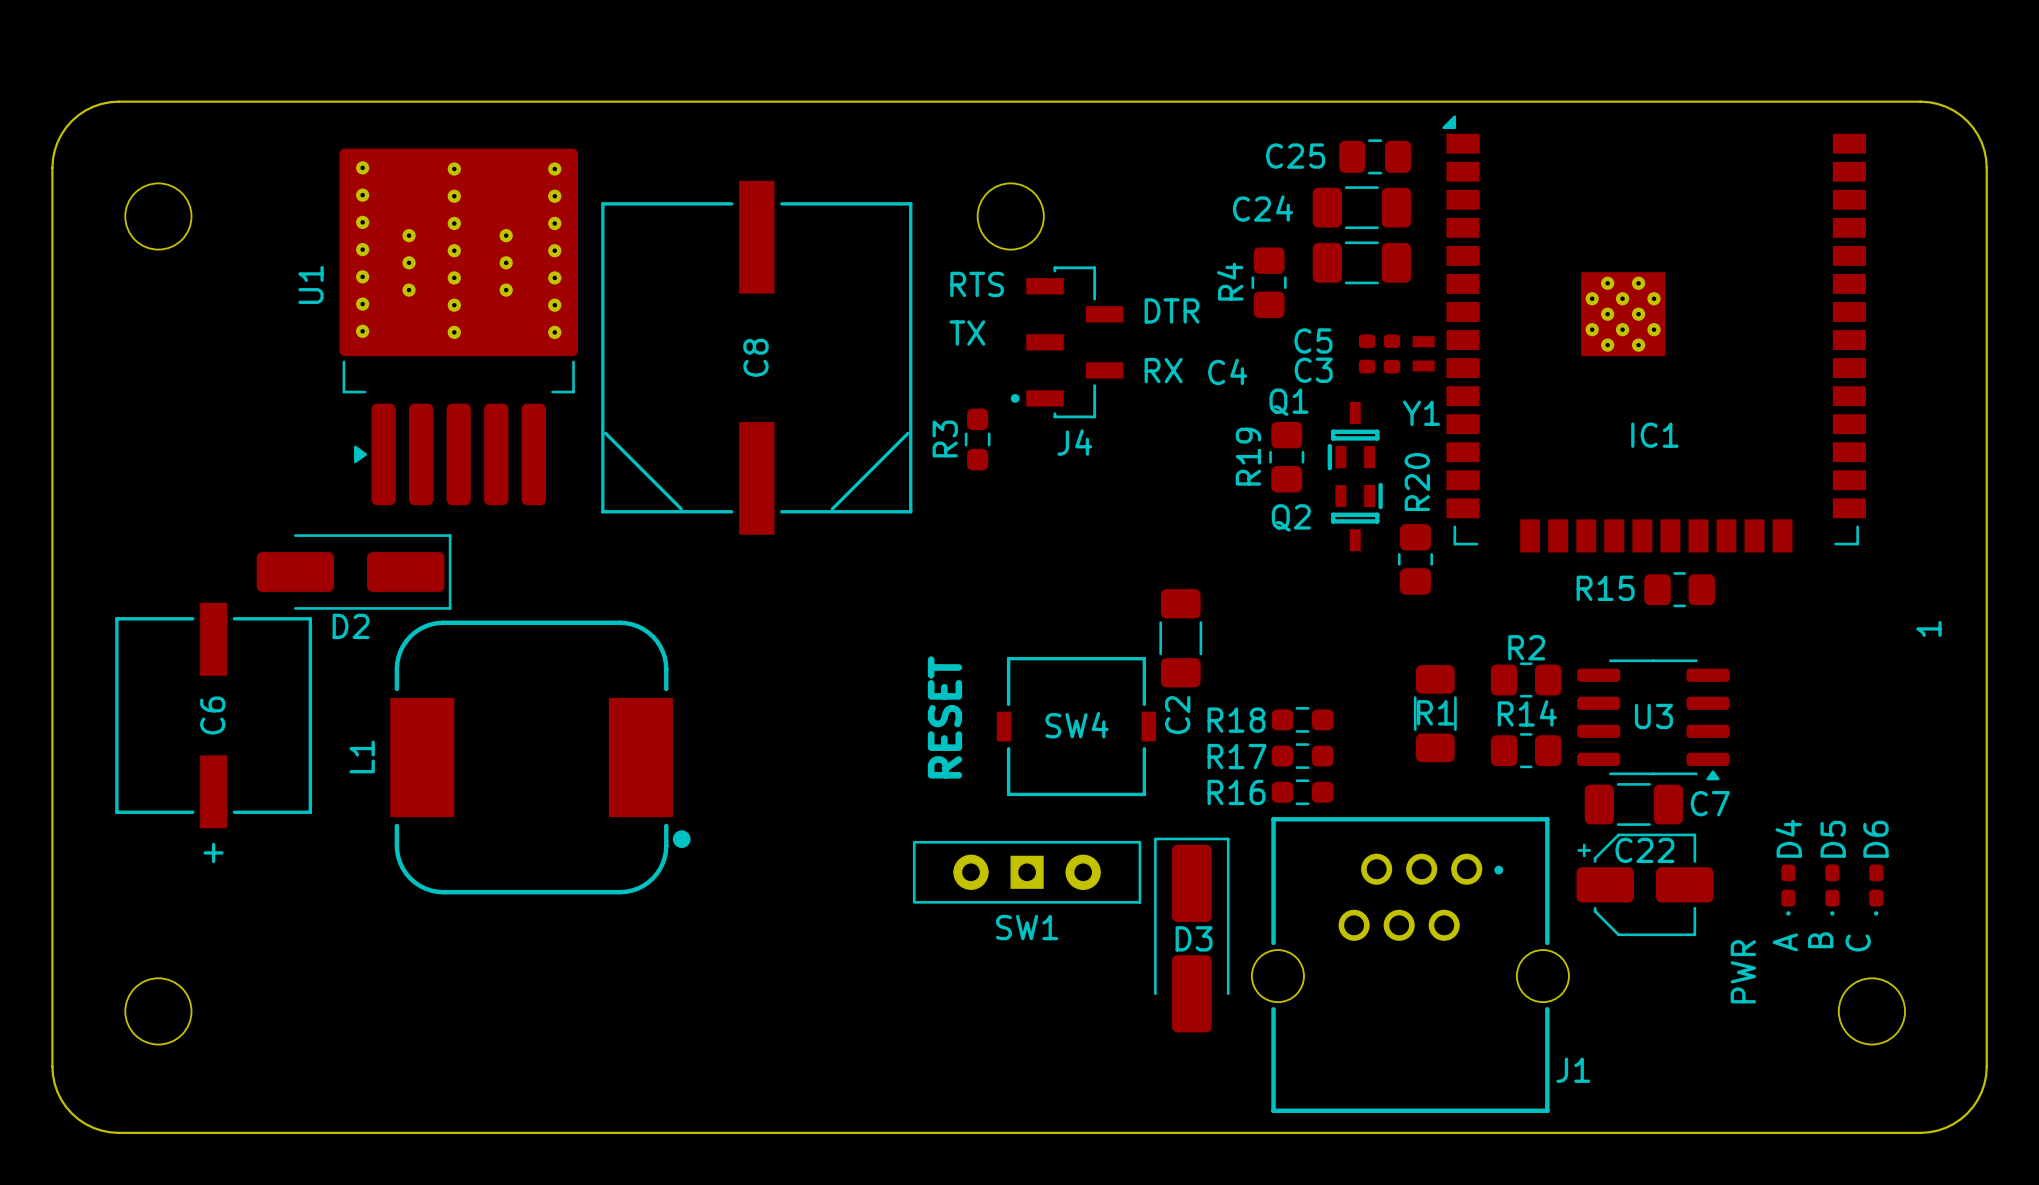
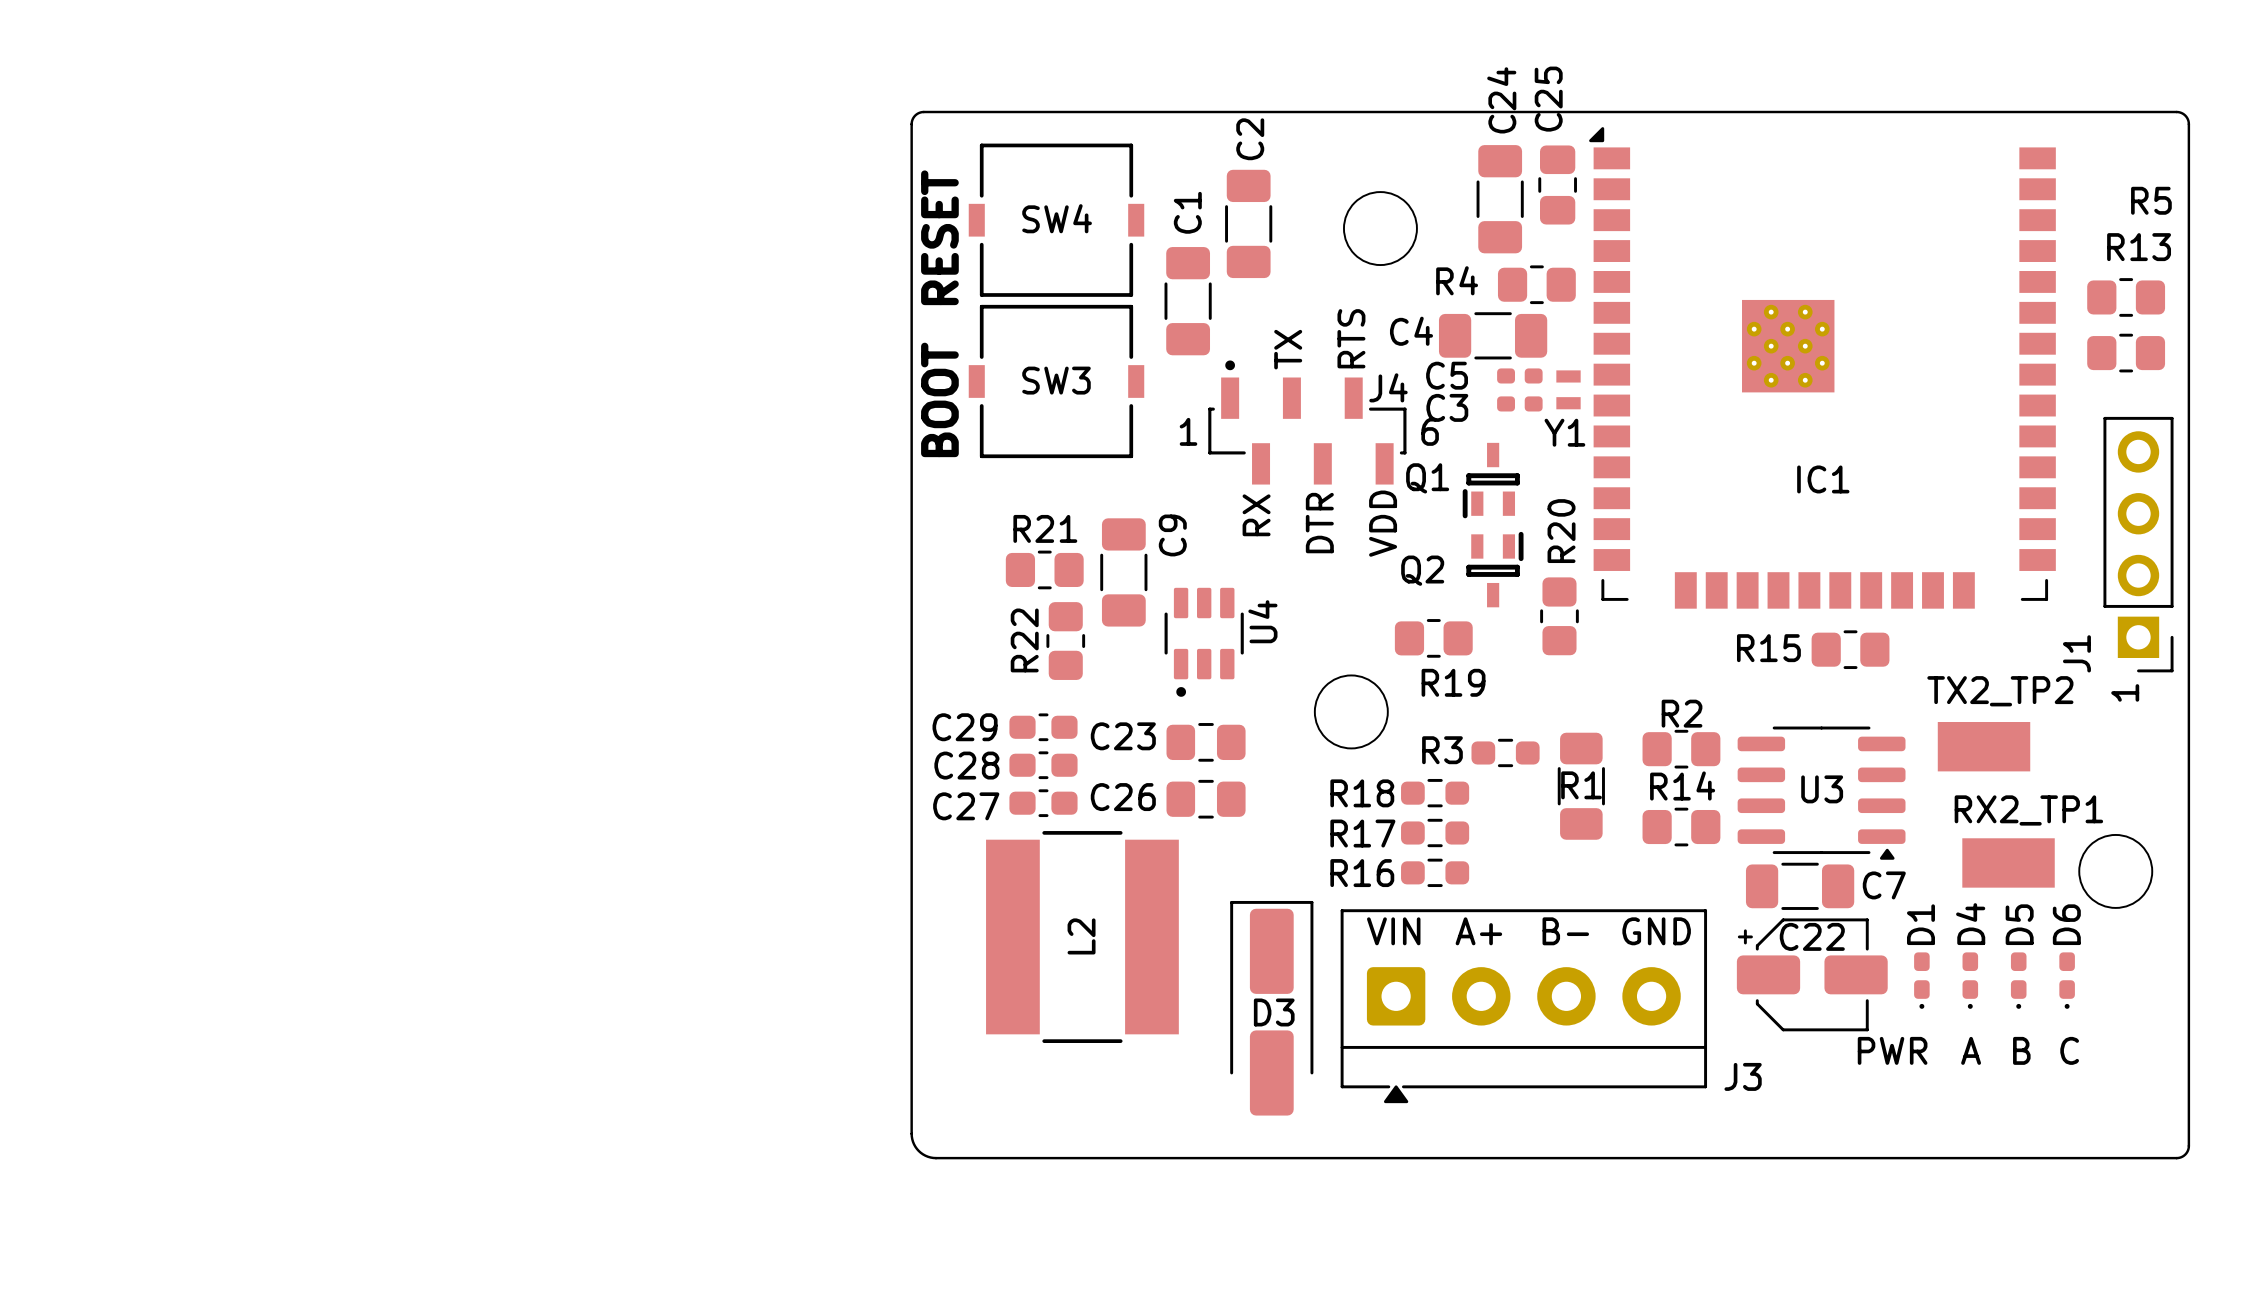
board edge: (838, 101) (118, 101) (93, 106) (78, 115) (66, 127) (57, 142) (52, 167) (52, 1066) (54, 1083) (61, 1099) (78, 1119) (101, 1130) (118, 1132) (1920, 1132) (1937, 1130) (1953, 1123) (1973, 1106) (1984, 1083) (1986, 1040) -> (923, 112) (915, 115) (911, 124) (911, 1133) (914, 1144) (920, 1152) (935, 1158) (2176, 1158) (2185, 1154) (2188, 1145)
board edge: (1920, 101) (1945, 106) (1967, 121) (1981, 142) (1986, 167) -> (2115, 112) (2176, 112) (2185, 115) (2188, 124) (2188, 184)
C25 rotation: 0° (1375, 156) -> 90° clockwise (1557, 184)
part: (362, 167) -> none
part: (454, 169) -> none
part: (554, 169) -> none
round board edge: none -> [1343, 191, 1418, 266]
round board edge: [124, 182, 193, 251] -> none
round board edge: [977, 182, 1045, 251] -> none
part: (362, 195) -> none
part: (454, 196) -> none
part: (554, 196) -> none
C24 rotation: 0° (1361, 207) -> 90° clockwise (1500, 199)
part: (362, 222) -> none
part: (454, 223) -> none
part: (554, 223) -> none
part: (409, 235) -> none
part: (506, 235) -> none
part: (362, 249) -> none
part: (454, 250) -> none
part: (554, 250) -> none
part: (409, 262) -> none
part: (506, 262) -> none
C4 position: (1361, 262) -> (1493, 335)
J4 footprint: [1010, 266, 1124, 419] -> [1208, 360, 1407, 485]
R5: none -> (2126, 297)
C1: none -> (1188, 301)
part: (362, 276) -> none
part: (454, 277) -> none
part: (554, 277) -> none
R4 rotation: 0° (1269, 282) -> 90° clockwise (1536, 284)
R4 position: (1269, 282) -> (1536, 284)
text rotation: 0° (977, 284) -> 90° counterclockwise (1351, 338)
text position: RTS (977, 284) -> RTS (1351, 338)
part: (409, 290) -> none
part: (506, 290) -> none
part: (362, 304) -> none
part: (454, 305) -> none
part: (554, 305) -> none
text rotation: 0° (1172, 310) -> 90° counterclockwise (1319, 523)
text position: DTR (1172, 310) -> DTR (1319, 523)
R13: none -> (2126, 353)
U1: (458, 326) -> none
part: (362, 331) -> none
part: (454, 332) -> none
part: (554, 332) -> none
text rotation: 0° (967, 333) -> 90° counterclockwise (1288, 349)
text position: TX (967, 333) -> TX (1288, 349)
SW3: none -> (1056, 381)
C8: (756, 357) -> none
text: none -> BOOT (939, 399)
text rotation: 0° (1163, 370) -> 90° counterclockwise (1256, 515)
text position: RX (1163, 370) -> RX (1256, 515)
C4 name position: C4 (1227, 371) -> C4 (1411, 331)
text: none -> 1 (1188, 431)
text: none -> 6 (1430, 431)
Q1 name position: Q1 (1288, 402) -> Q1 (1427, 478)
Y1 name position: Y1 (1421, 413) -> Y1 (1564, 432)
R3 rotation: 0° (977, 439) -> 90° clockwise (1505, 752)
R3 position: (977, 439) -> (1505, 752)
J4 name position: J4 (1074, 442) -> J4 (1388, 387)
R19 name position: R19 (1248, 456) -> R19 (1453, 682)
R19 rotation: 0° (1286, 457) -> 90° clockwise (1433, 638)
R19 position: (1286, 457) -> (1433, 638)
text: none -> VDD (1383, 523)
R21: none -> (1044, 569)
C9: none -> (1123, 572)
D2: (354, 571) -> none
R22: none -> (1065, 641)
U4: none -> (1204, 642)
round board edge: none -> [1314, 674, 1389, 750]
C2 position: (1180, 638) -> (1248, 223)
C29: none -> (1043, 727)
C23: none -> (1206, 742)
TX2_TP2: none -> (1984, 746)
C28: none -> (1043, 765)
C2 name position: C2 (1177, 715) -> C2 (1250, 139)
text position: RESET (944, 717) -> RESET (939, 237)
C26: none -> (1206, 799)
SW4 position: (1076, 726) -> (1056, 220)
C27: none -> (1043, 803)
C6: (213, 732) -> none
L1: (540, 757) -> none
RX2_TP1: none -> (2008, 862)
J1 footprint: [1251, 817, 1569, 1113] -> [2103, 416, 2174, 673]
text: none -> VIN (1393, 931)
text: none -> A+ (1478, 931)
text: none -> B- (1565, 931)
text: none -> GND (1656, 931)
L2: none -> (1082, 937)
SW1: (1027, 872) -> none
D1: none -> (1921, 980)
J3: none -> (1523, 1006)
D3 position: (1191, 935) -> (1271, 1008)
text rotation: 0° (1820, 940) -> 90° clockwise (2021, 1050)
text rotation: 0° (1785, 942) -> 90° clockwise (1971, 1050)
text rotation: 0° (1858, 942) -> 90° clockwise (2069, 1050)
text rotation: 0° (1743, 971) -> 90° clockwise (1892, 1050)
round board edge: [124, 977, 193, 1046] -> none
round board edge position: (1871, 1011) -> (2115, 871)
J1 name position: J1 (1573, 1070) -> J1 (2076, 653)

